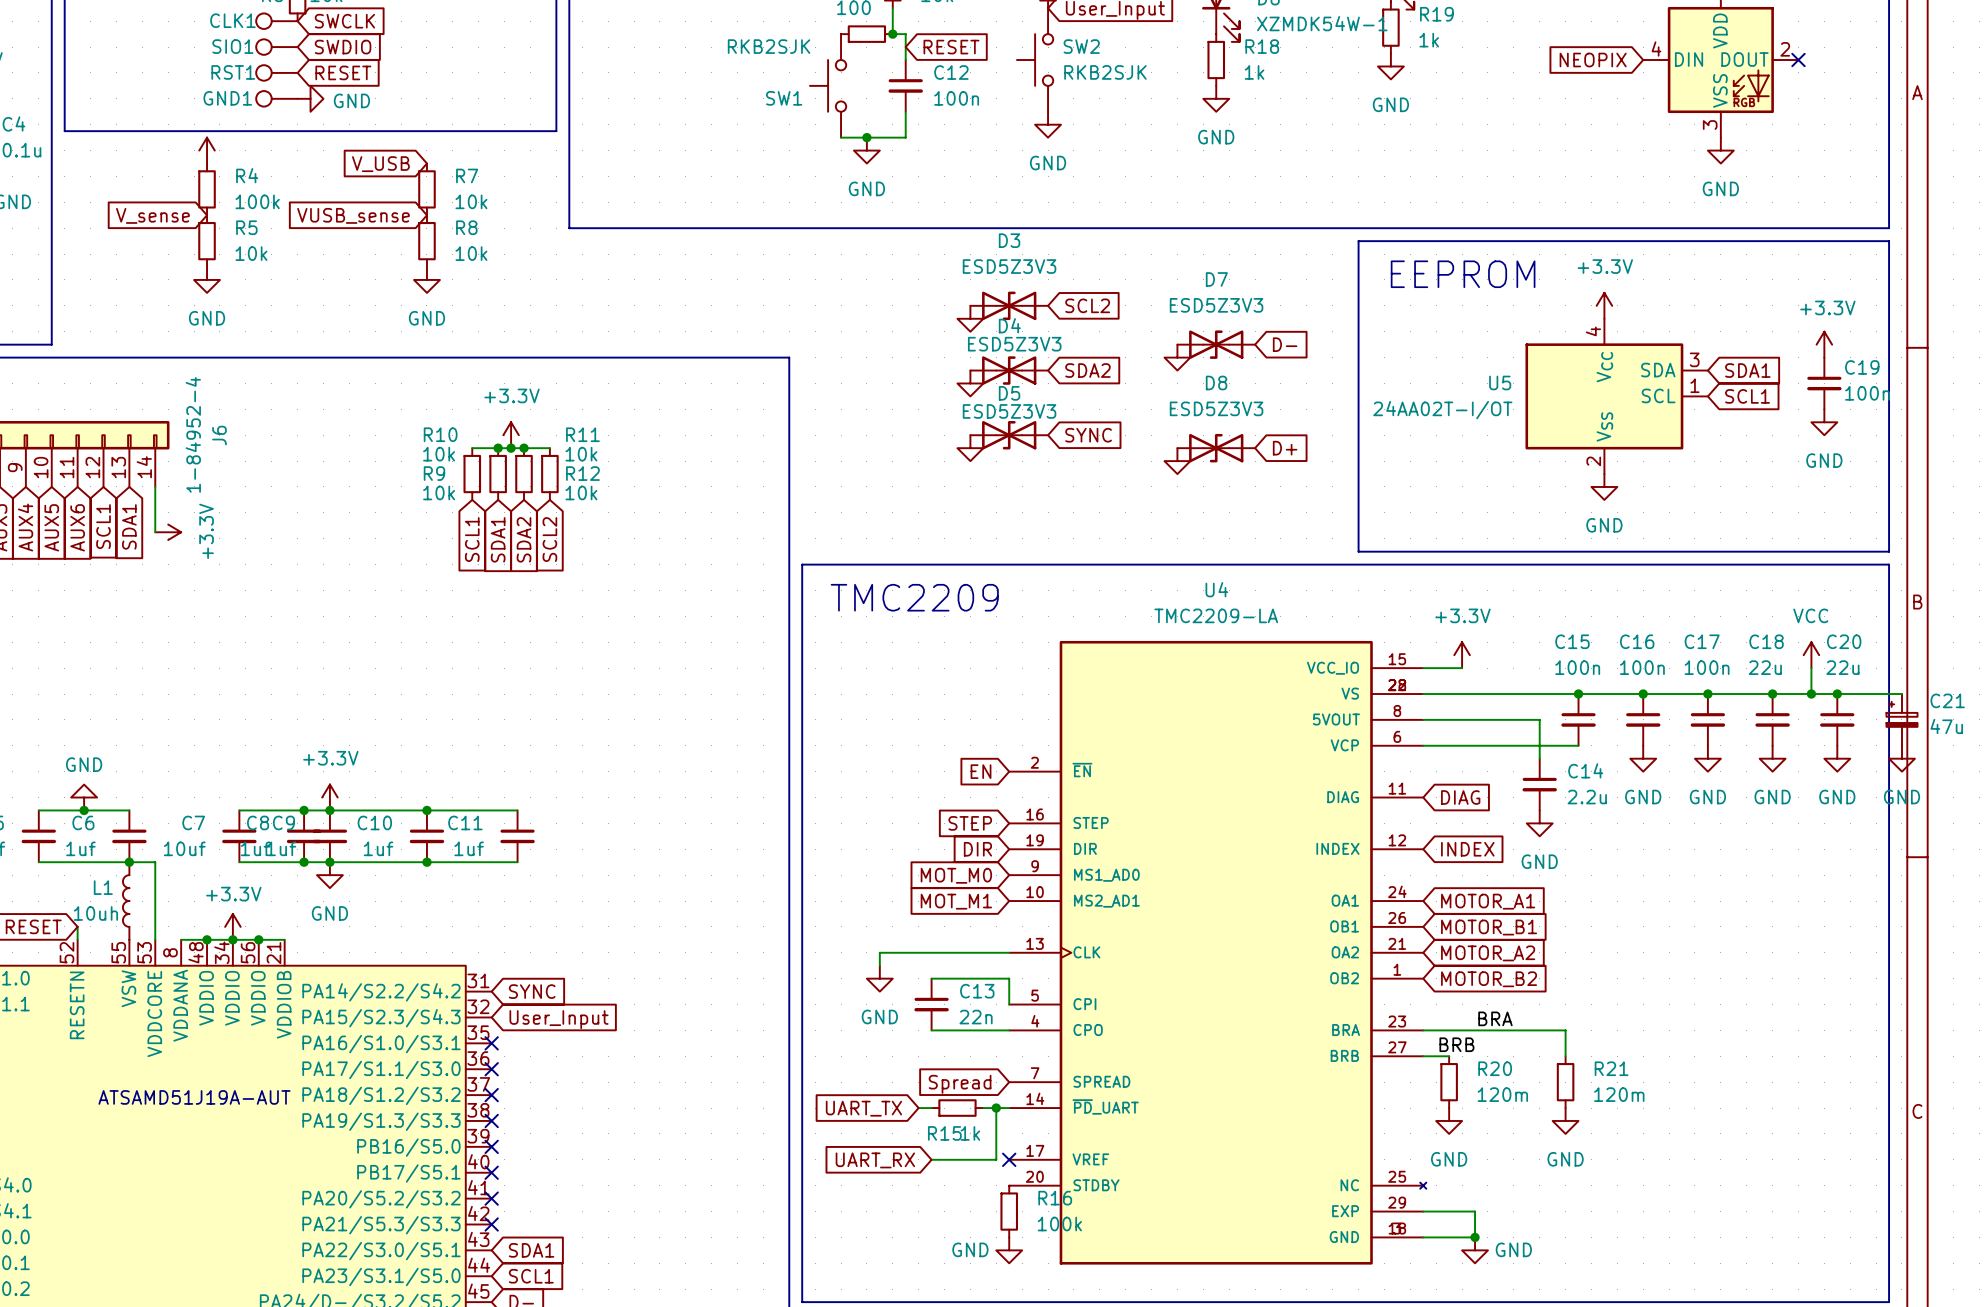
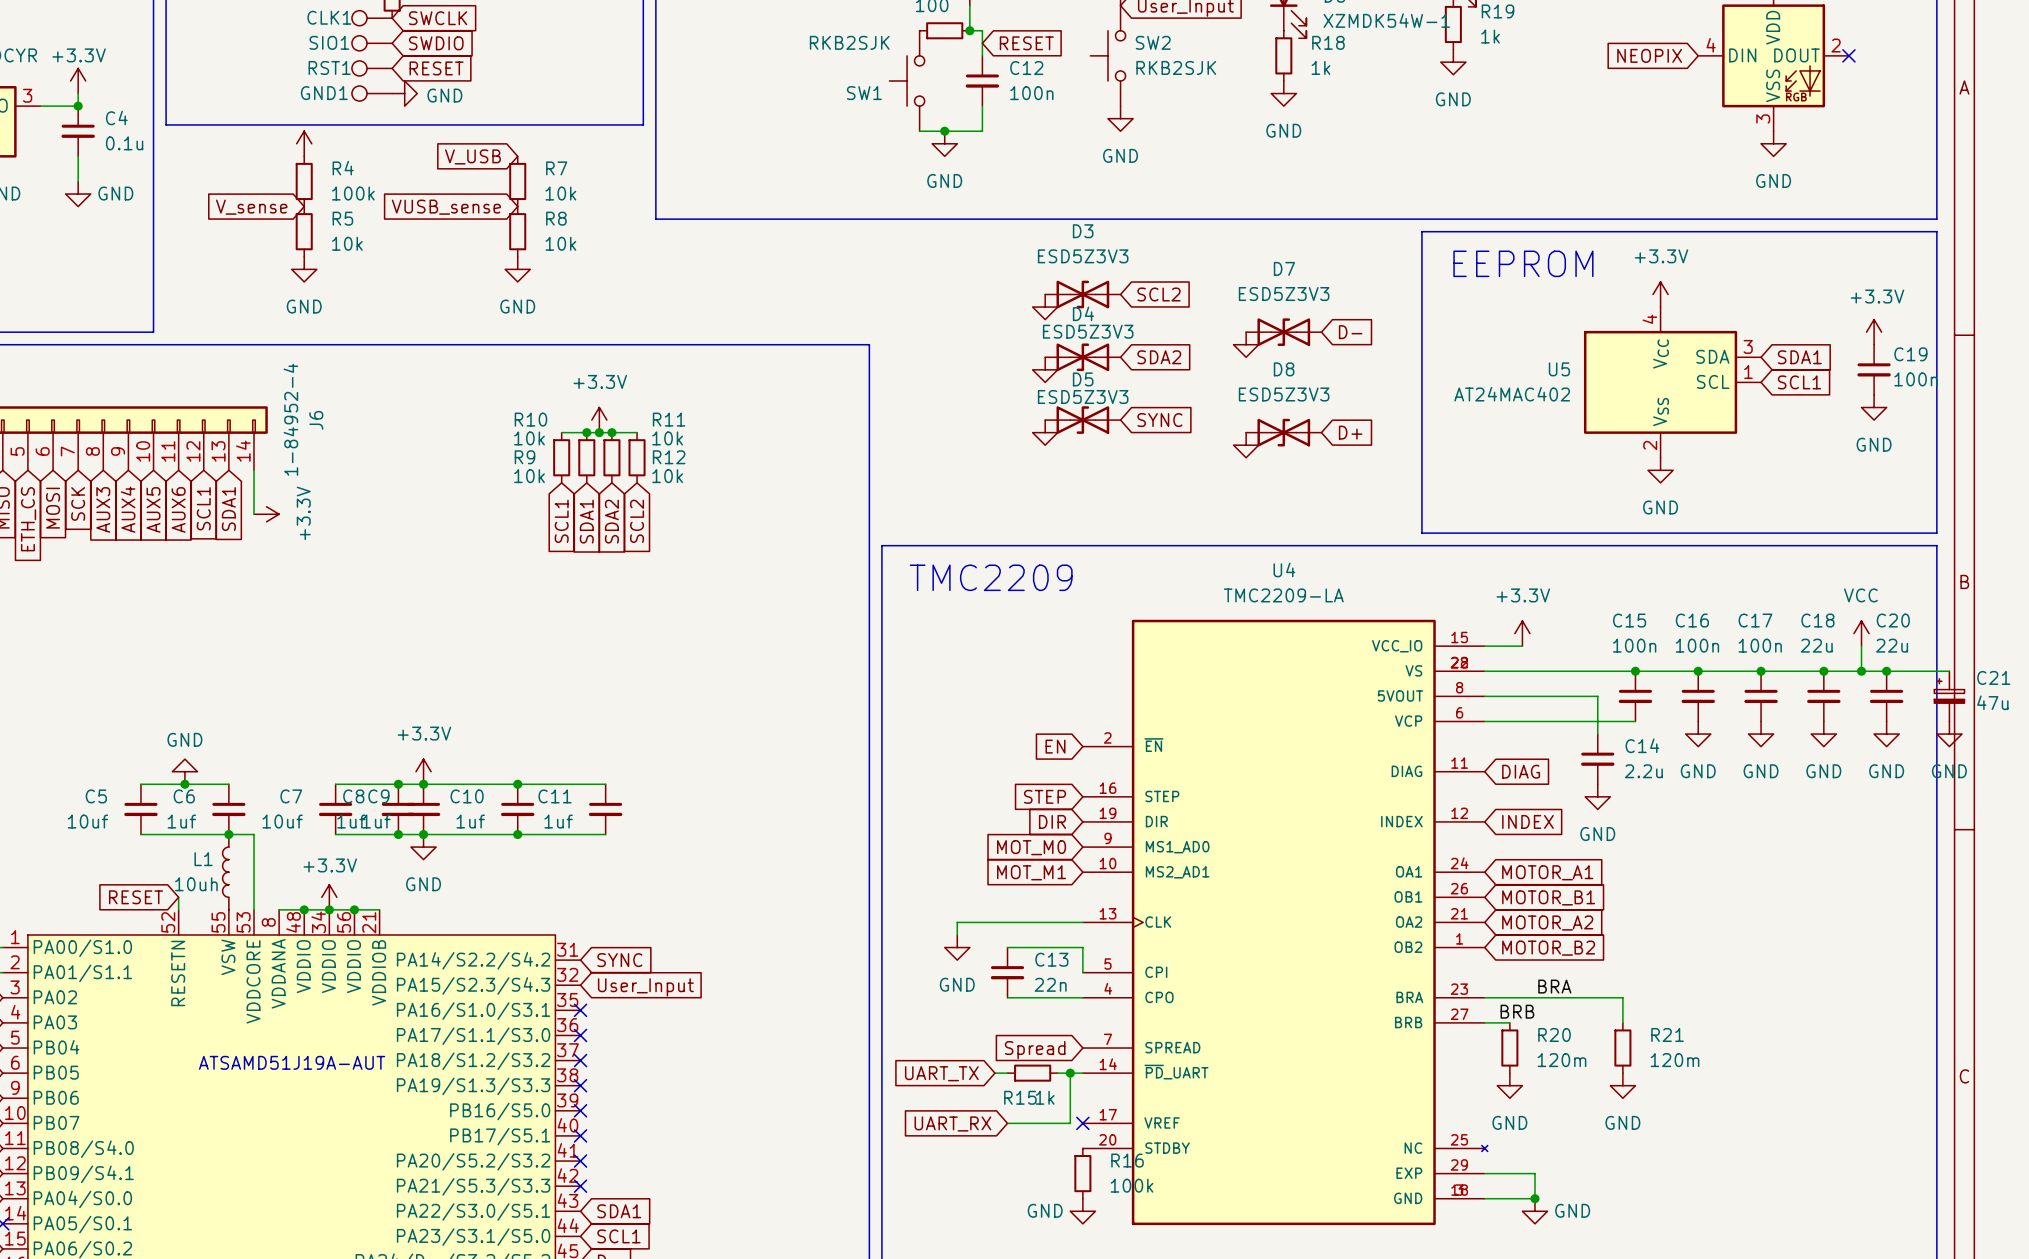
U5 value: 24AA02T-I/OT (1442, 410) -> AT24MAC402 (1512, 394)

